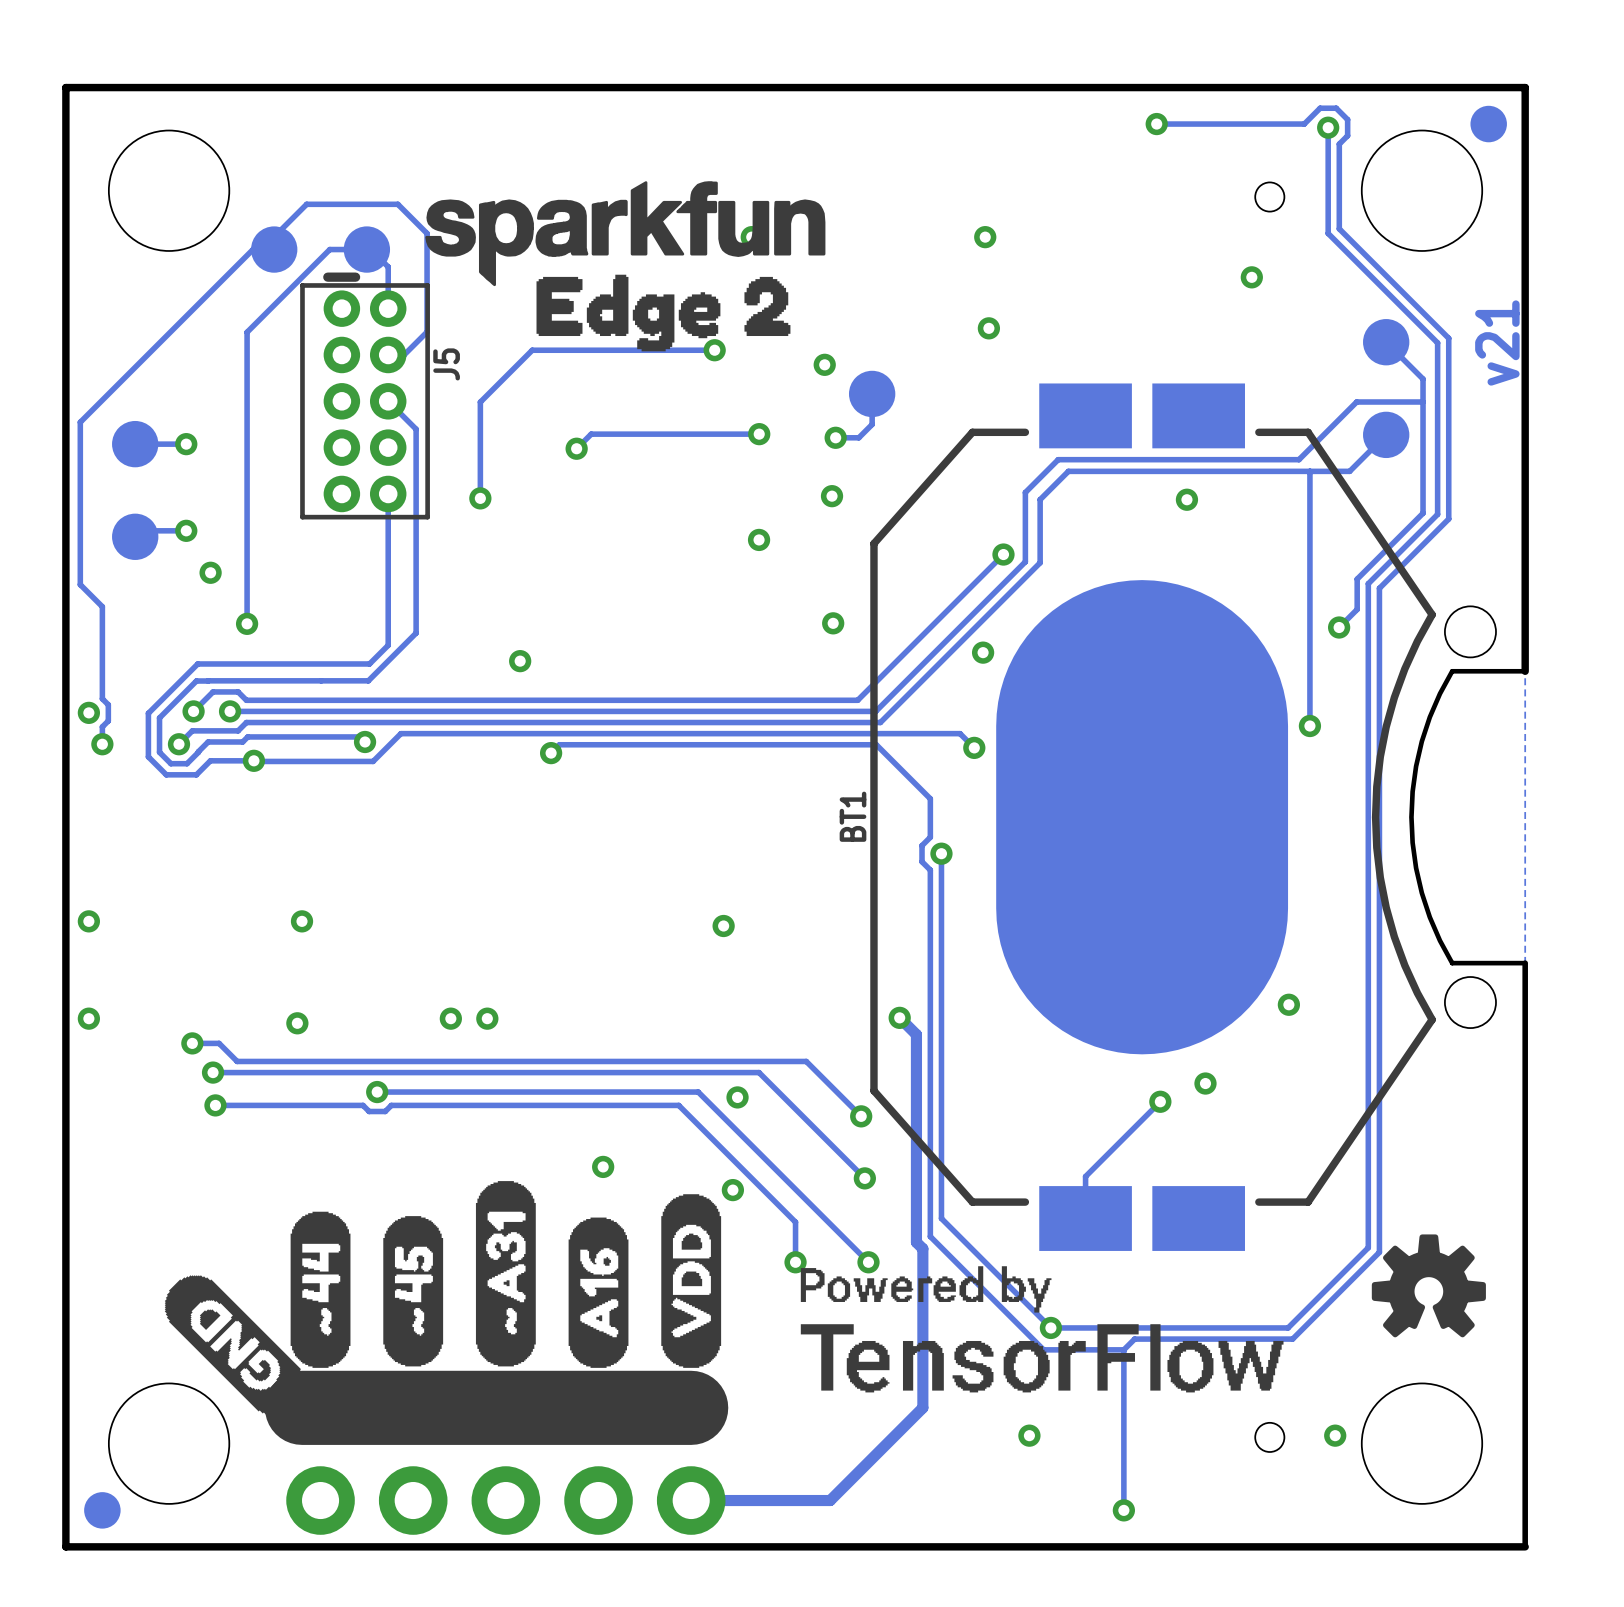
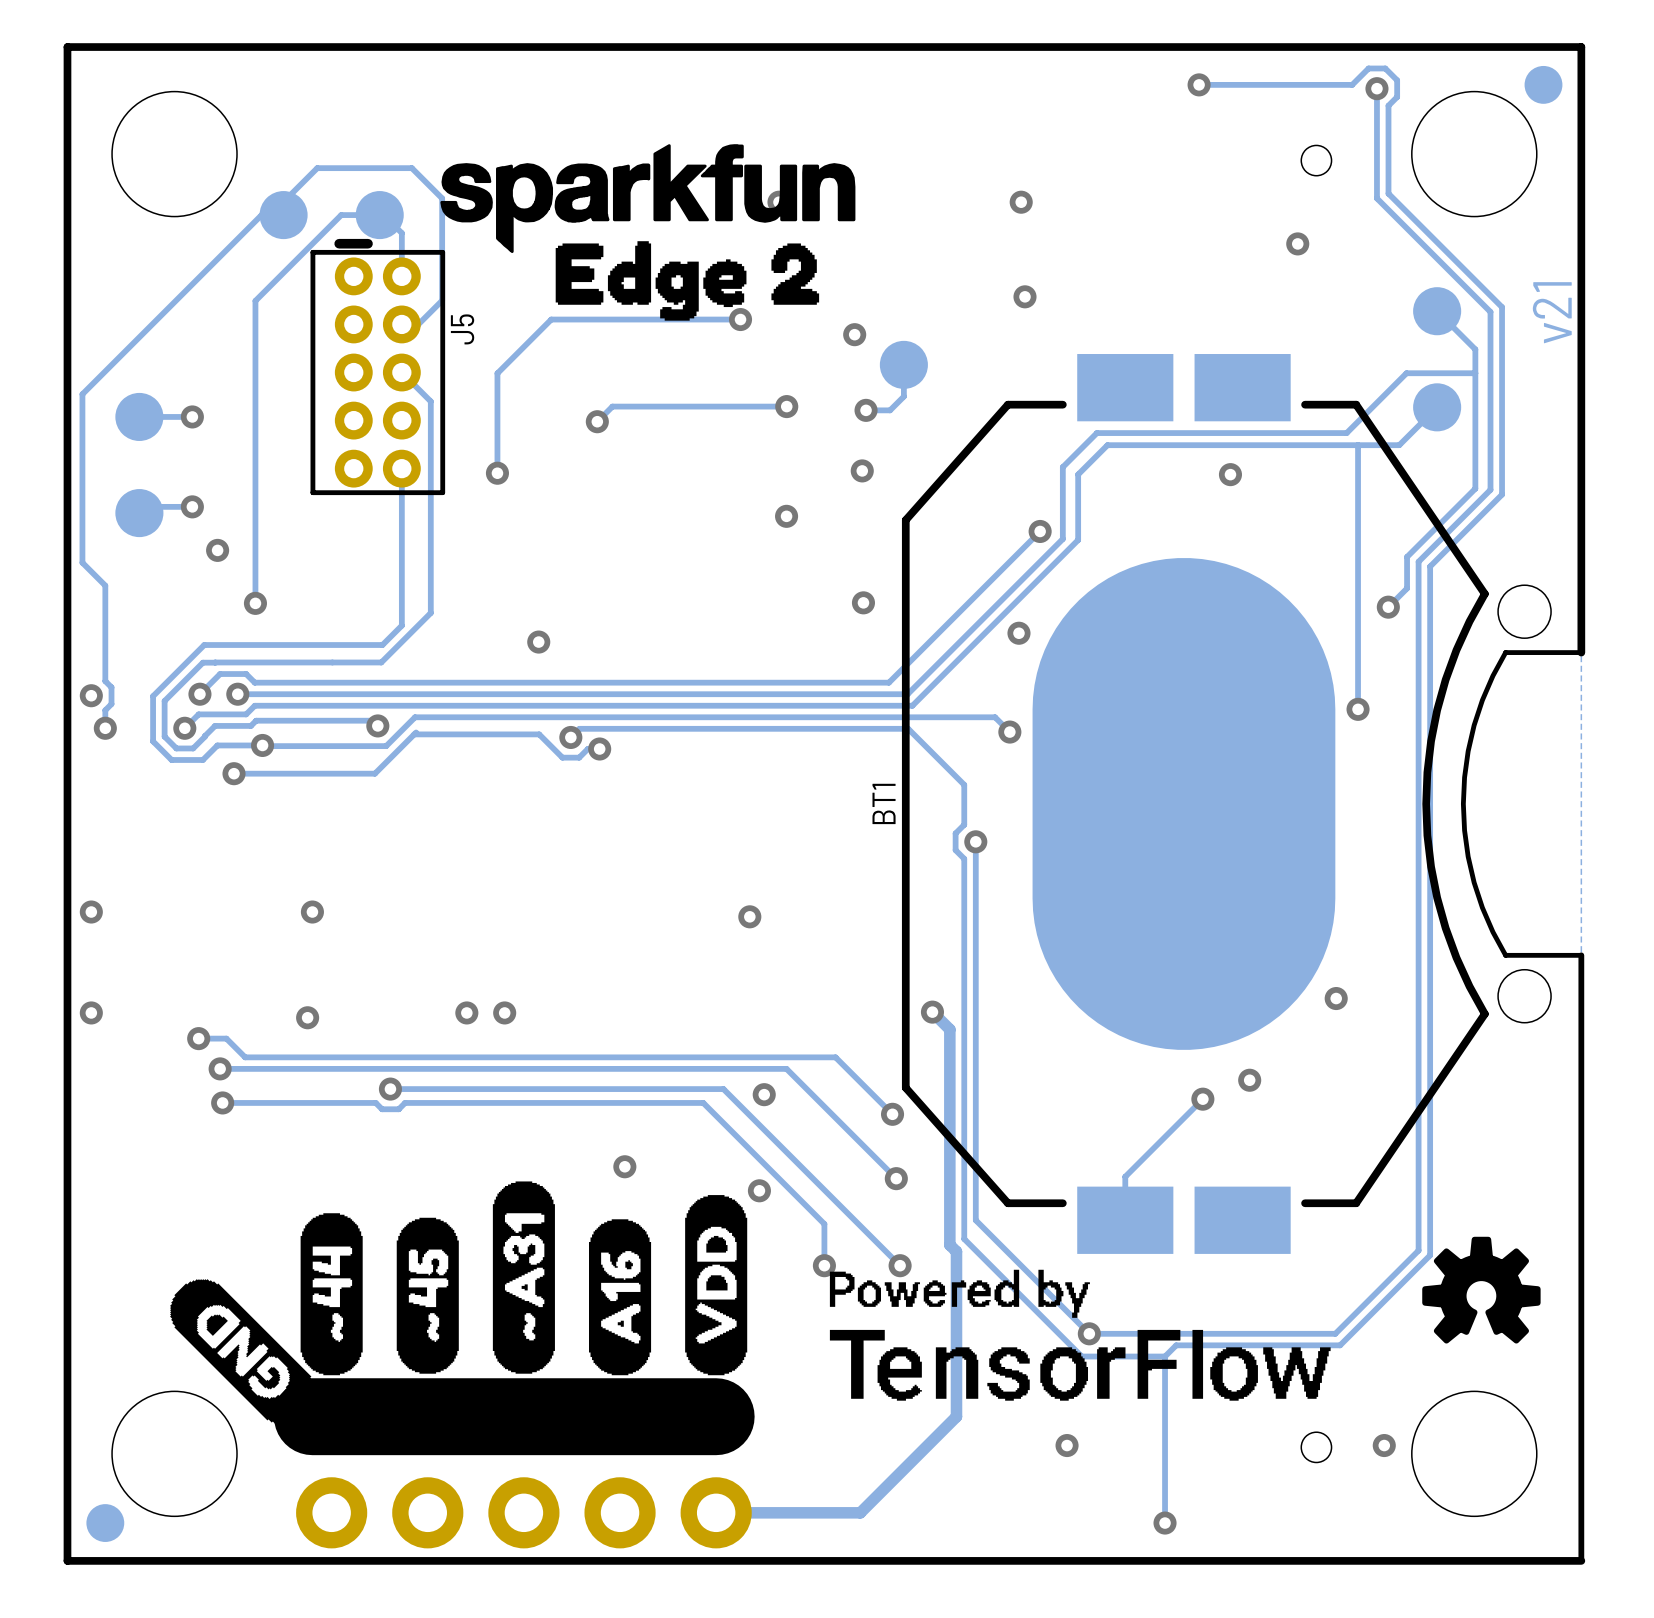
track: none -> (416, 732) (374, 773) (234, 773)
track: none -> (414, 734) (539, 734) (562, 757) (579, 757) (587, 749) (599, 749)
via: none -> (599, 749)
via: none -> (234, 773)

